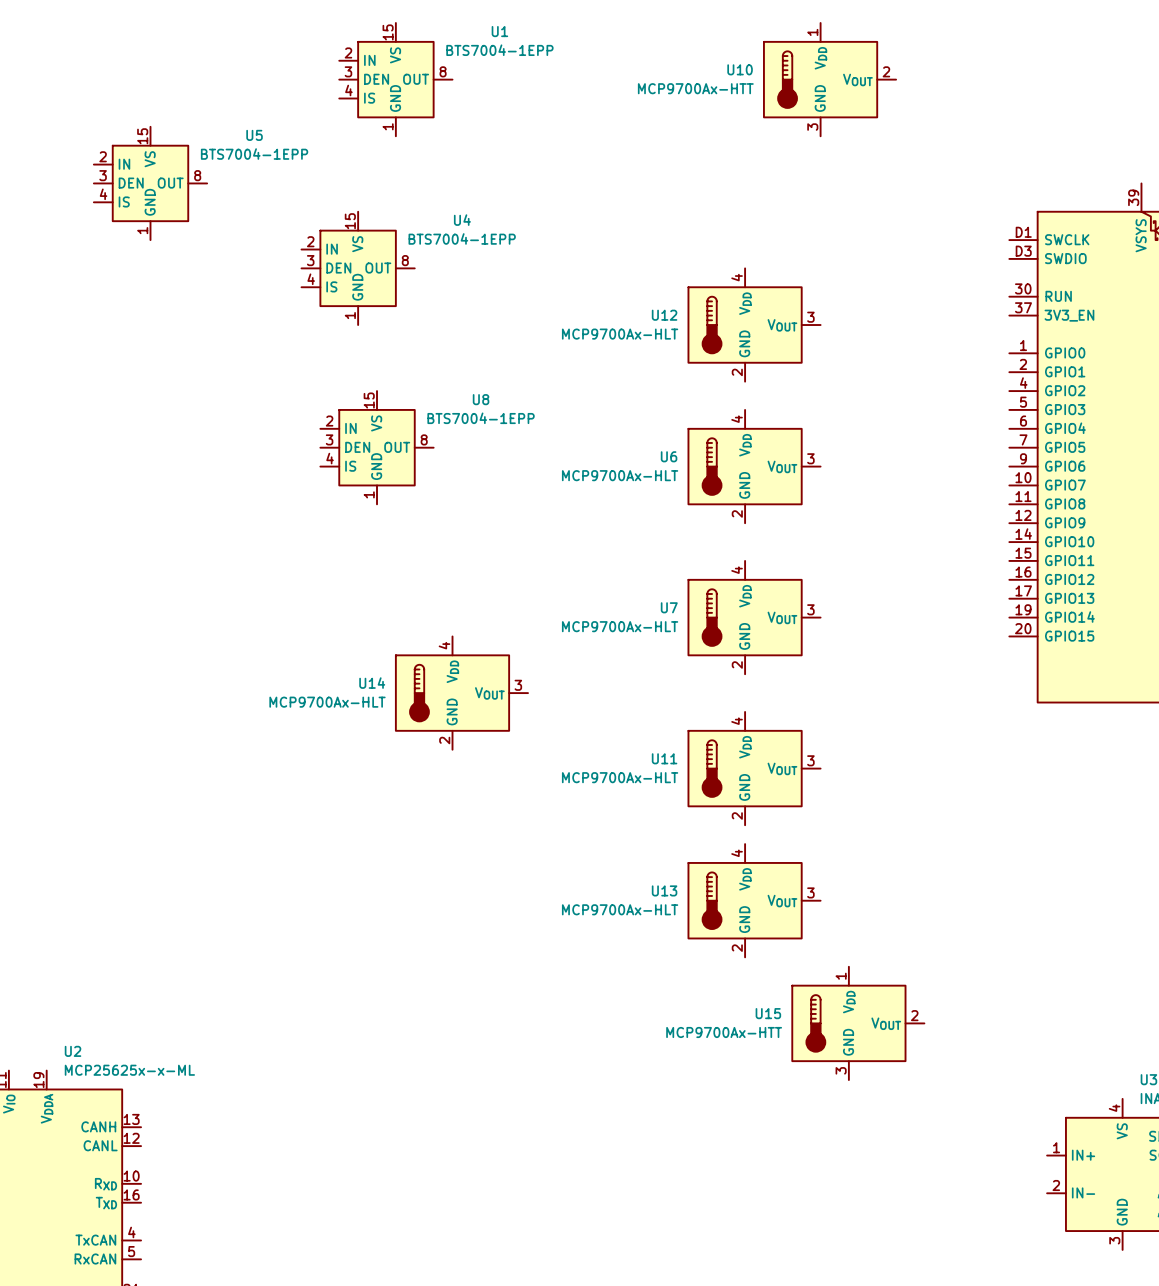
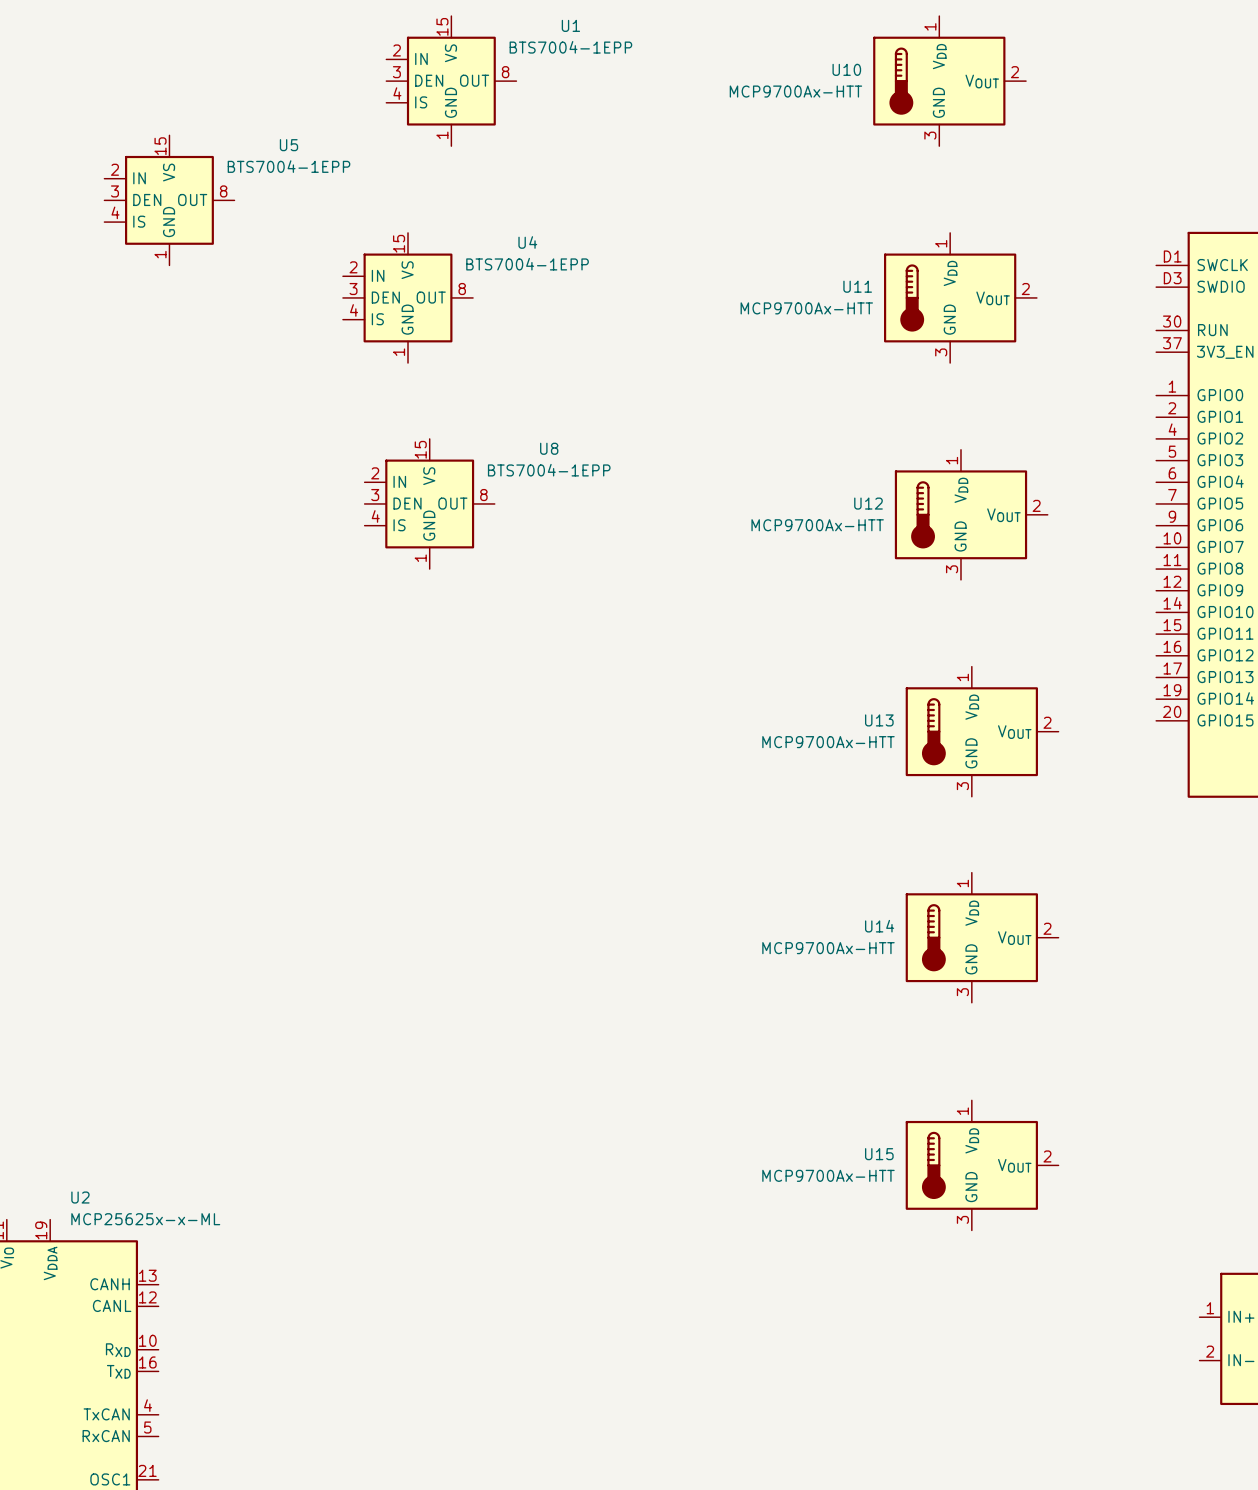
U12 pin number: 4 (737, 277) -> 1 (952, 460)
U12 pin number: 3 (810, 317) -> 2 (1036, 505)
U12 position: (754, 325) -> (971, 514)
U12 value: MCP9700Ax-HLT (620, 334) -> MCP9700Ax-HTT (817, 525)
U12 pin number: 2 (737, 372) -> 3 (952, 569)
U6: MCP9700Ax-HLT (754, 466) -> none
U7: MCP9700Ax-HLT (754, 617) -> none
U14 pin number: 4 (444, 645) -> 1 (962, 883)
U14 pin number: 3 (518, 685) -> 2 (1047, 928)
U14 position: (461, 693) -> (982, 937)
U14 value: MCP9700Ax-HLT (327, 702) -> MCP9700Ax-HTT (828, 948)
U11 pin number: 4 (737, 721) -> 1 (941, 243)
U14 pin number: 2 (444, 740) -> 3 (962, 992)
U11 pin number: 3 (810, 760) -> 2 (1025, 289)
U11 position: (754, 768) -> (960, 297)
U11 value: MCP9700Ax-HLT (620, 777) -> MCP9700Ax-HTT (806, 308)
U11 pin number: 2 (737, 816) -> 3 (941, 352)
U13 pin number: 4 (737, 853) -> 1 (962, 677)
U13 pin number: 3 (810, 892) -> 2 (1047, 722)
U13 position: (754, 900) -> (982, 731)
U13 value: MCP9700Ax-HLT (620, 909) -> MCP9700Ax-HTT (828, 742)
U13 pin number: 2 (737, 948) -> 3 (962, 786)

